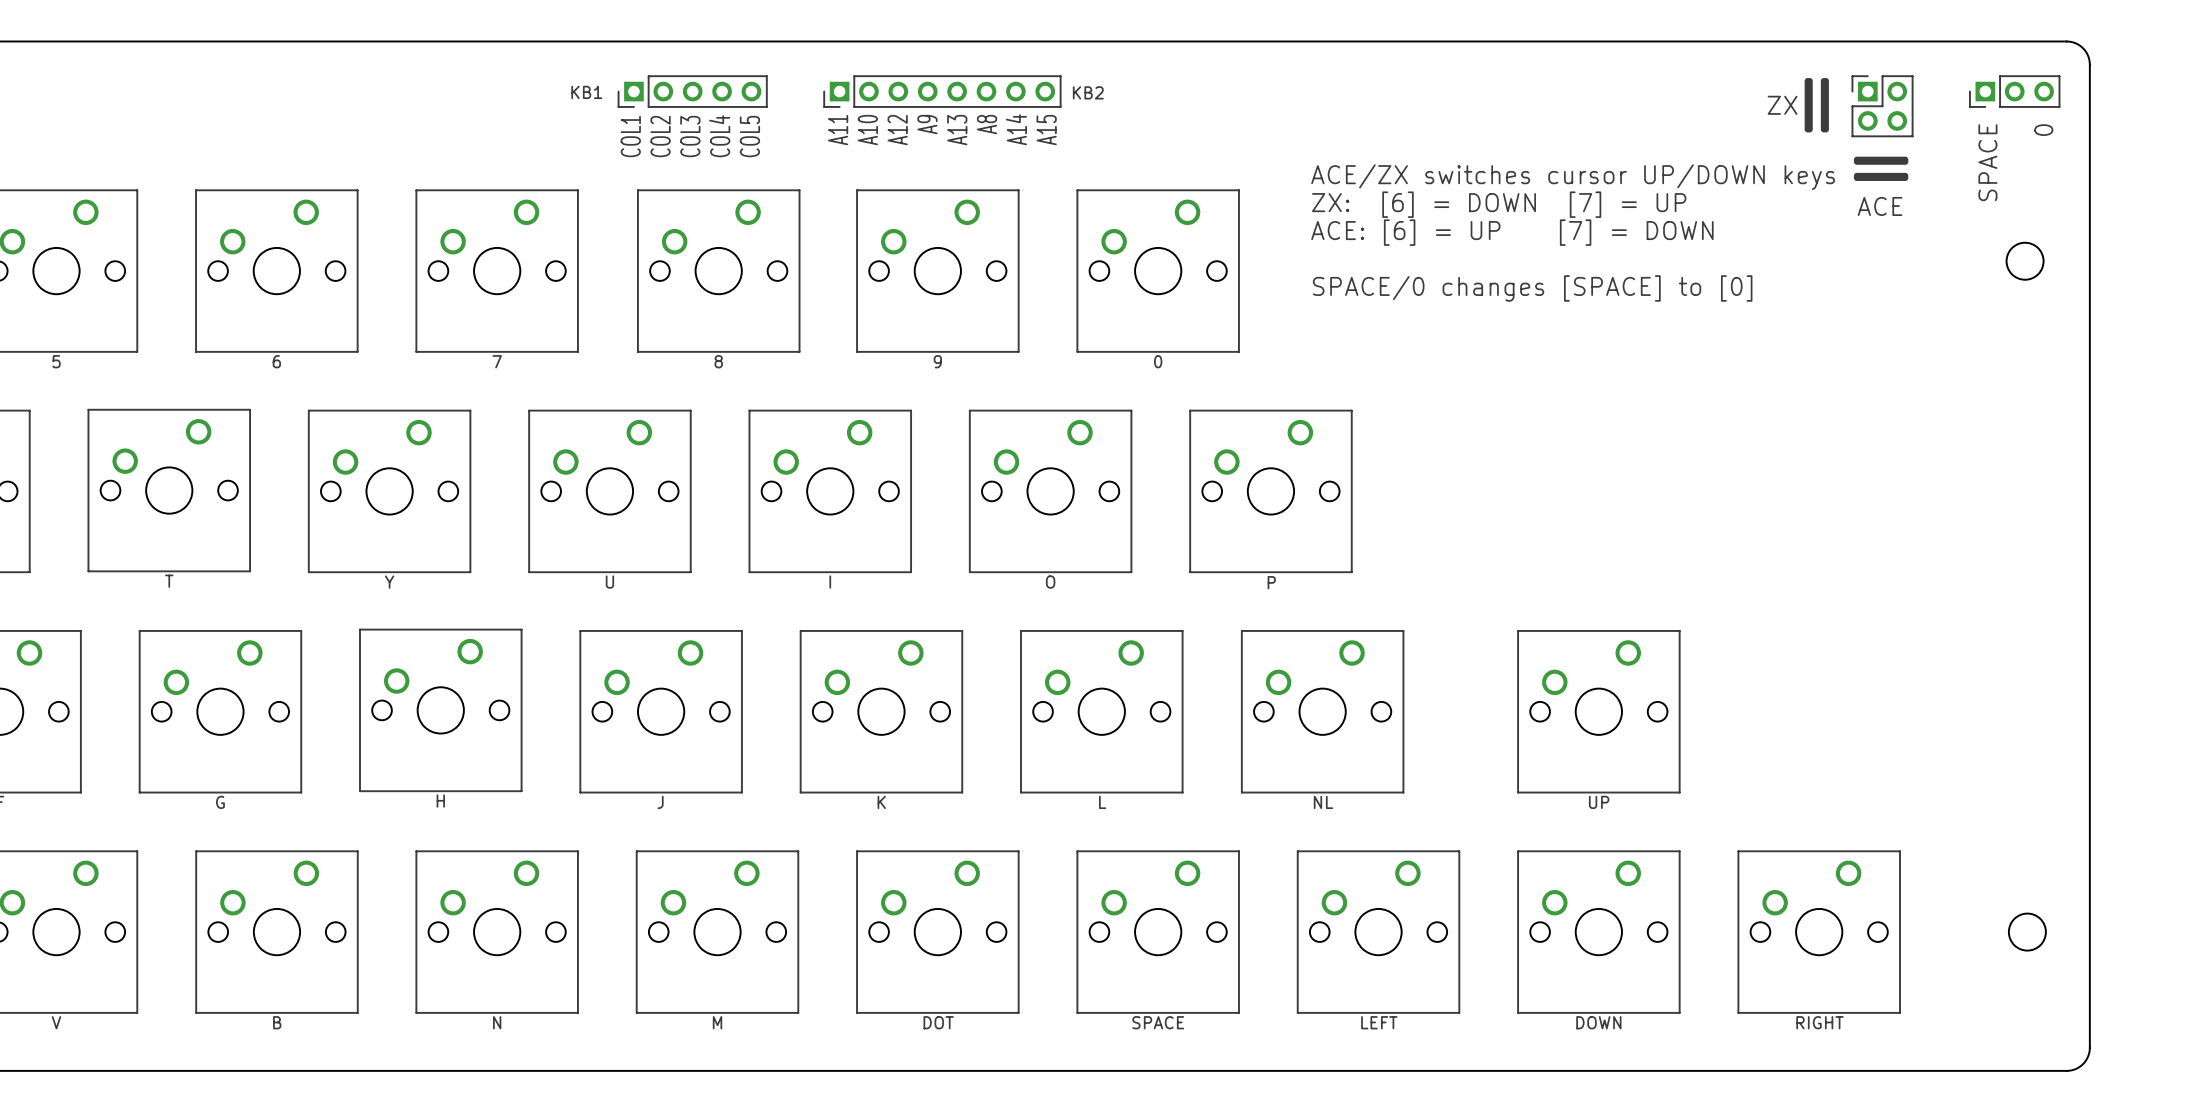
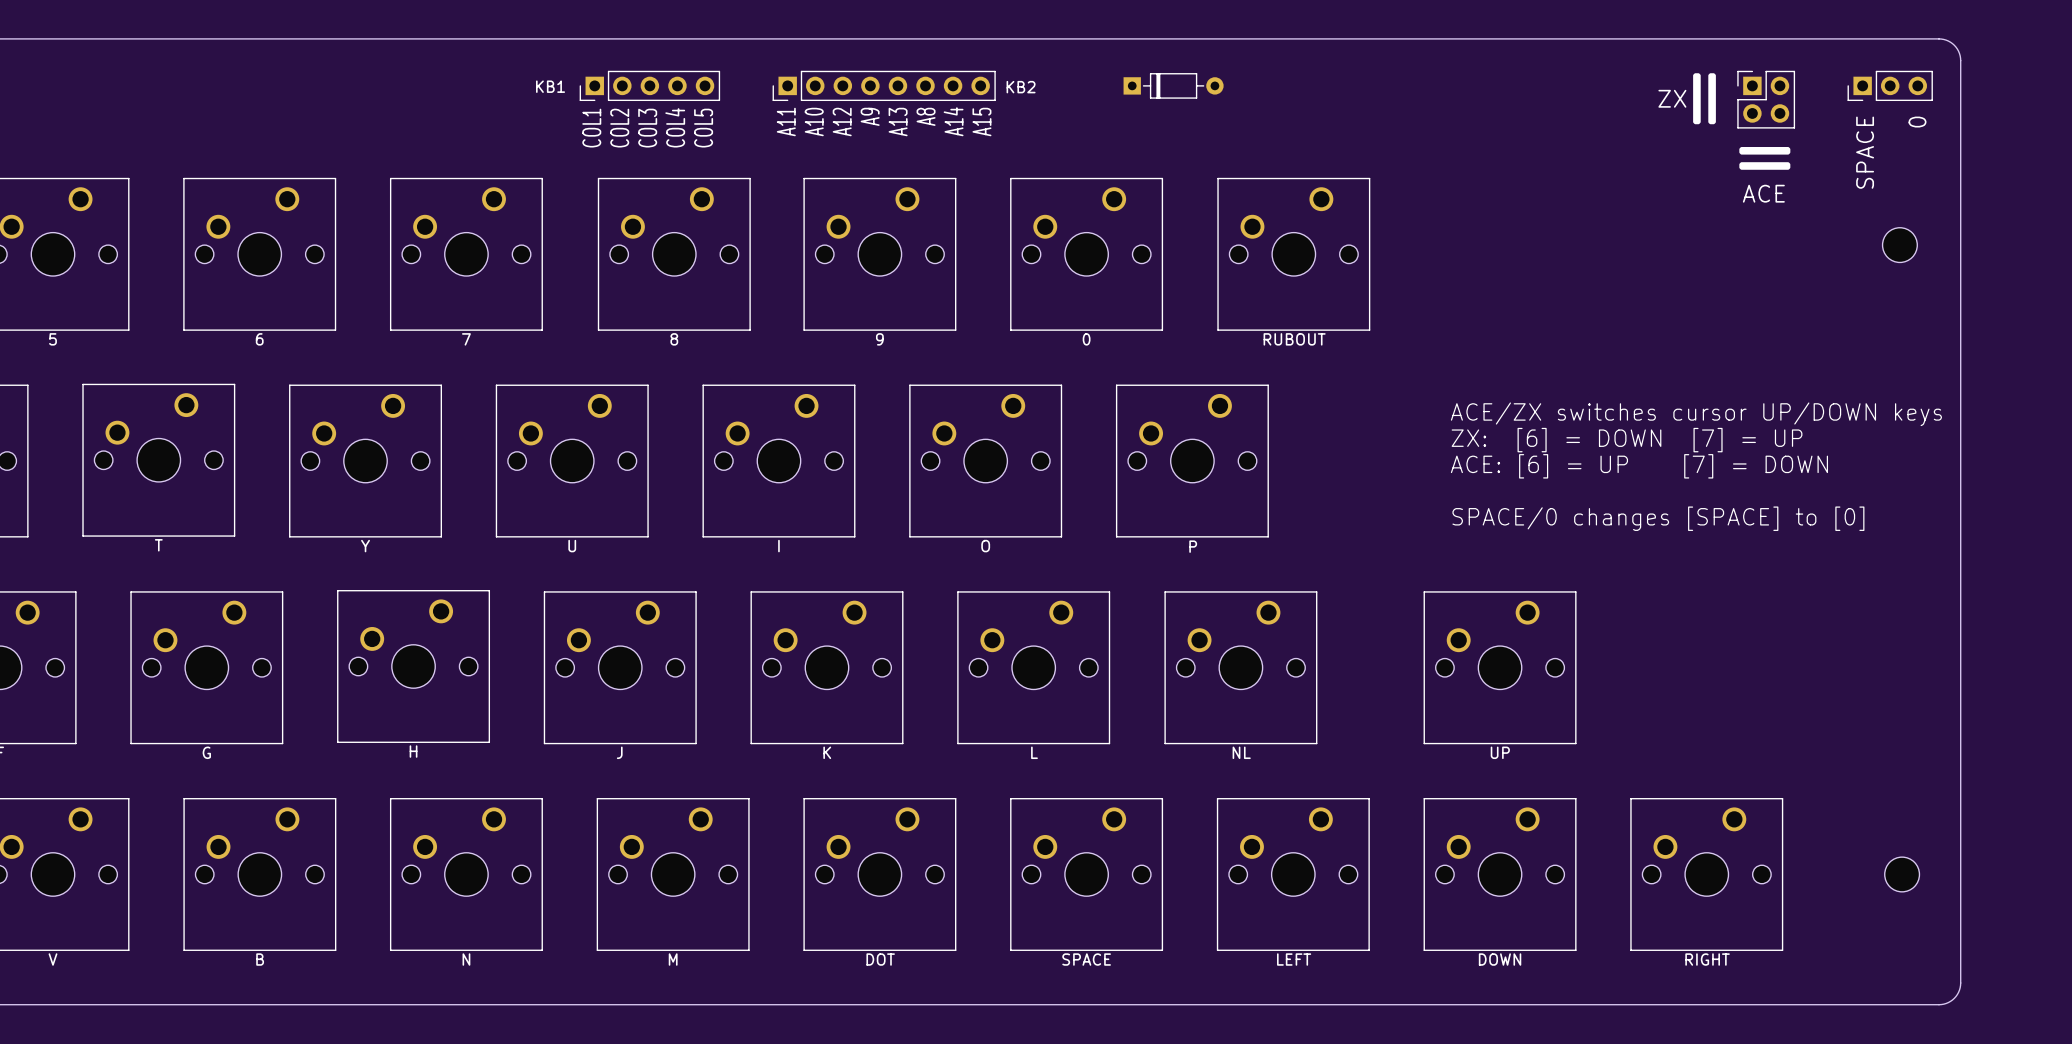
part: none -> (1173, 85)
text: ACE/ZX switches cursor UP/DOWN keys (1573, 177) -> none
text: ZX: [6] = DOWN [7] = UP (1499, 204) -> none
text: ACE: [6] = UP [7] = DOWN (1512, 232) -> none
part: none -> RUBOUT (1293, 254)
text: SPACE/0 changes [SPACE] to [0] (1532, 288) -> none
text: none -> ACE/ZX switches cursor UP/DOWN keys (1696, 414)
text: none -> ZX: [6] = DOWN [7] = UP (1627, 440)
text: none -> ACE: [6] = UP [7] = DOWN (1639, 466)
text: none -> SPACE/0 changes [SPACE] to [0] (1658, 518)

